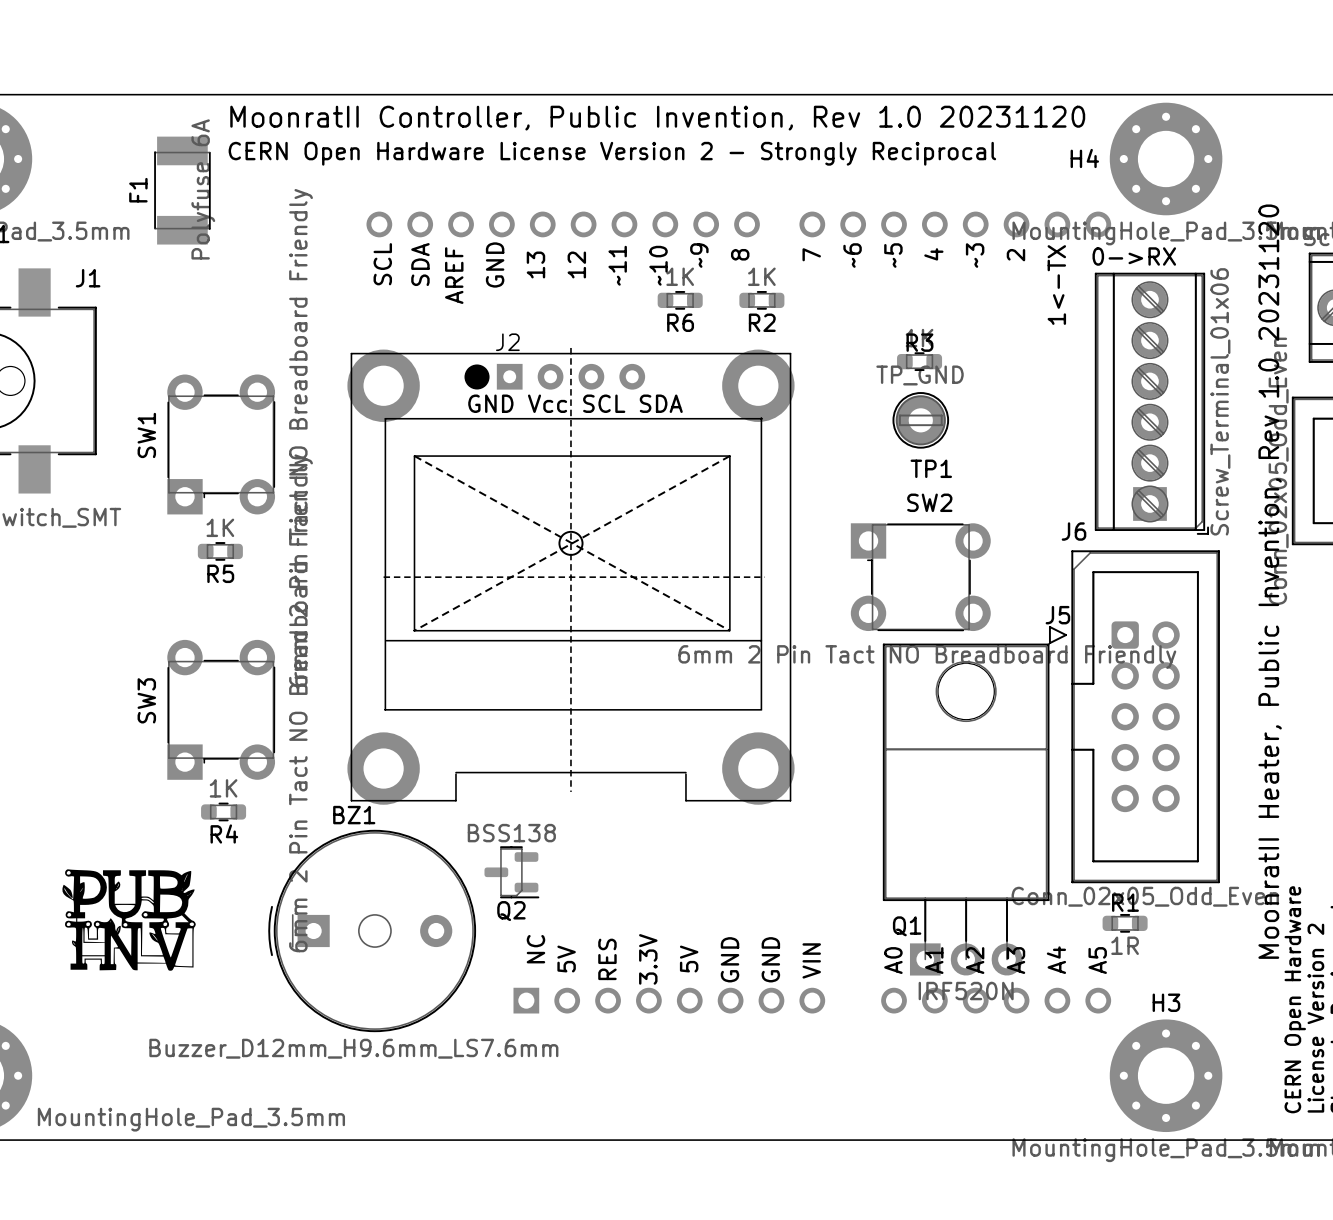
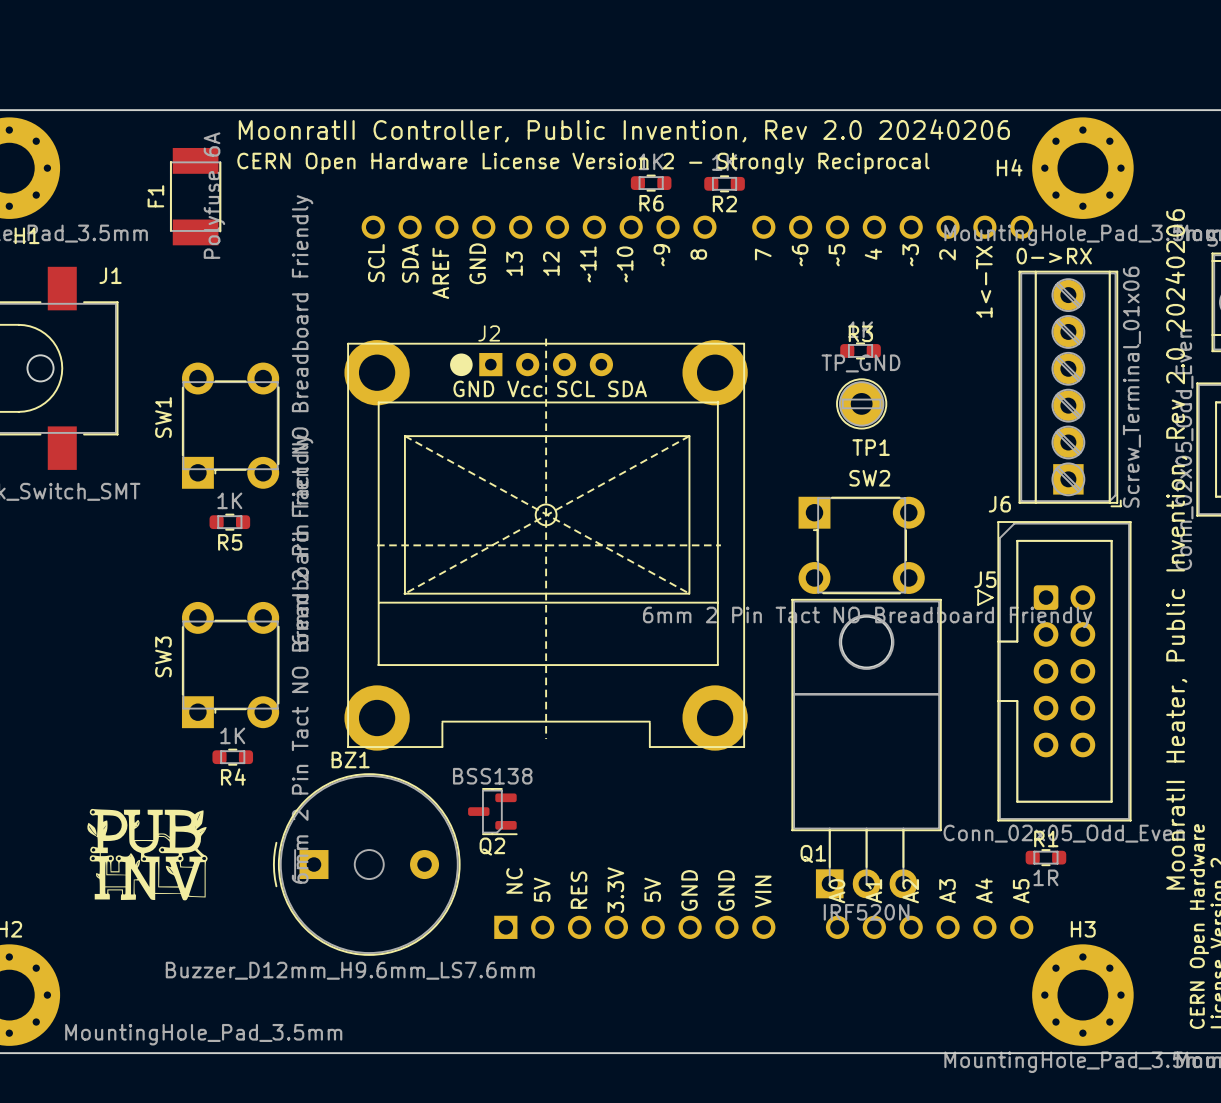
text: MoonratII Controller, Public Invention, Rev 1.0 20231120 (657, 118) -> MoonratII Controller, Public Invention, Rev 2.0 20240206 (624, 130)
R6 position: (680, 300) -> (651, 183)
R2 position: (761, 300) -> (724, 183)
text: MoonratII Heater, Public Invention, Rev 1.0 20231120 (1270, 581) -> MoonratII Heater, Public Invention, Rev 2.0 20240206 (1176, 549)
Q1 position: (966, 809) -> (866, 748)

